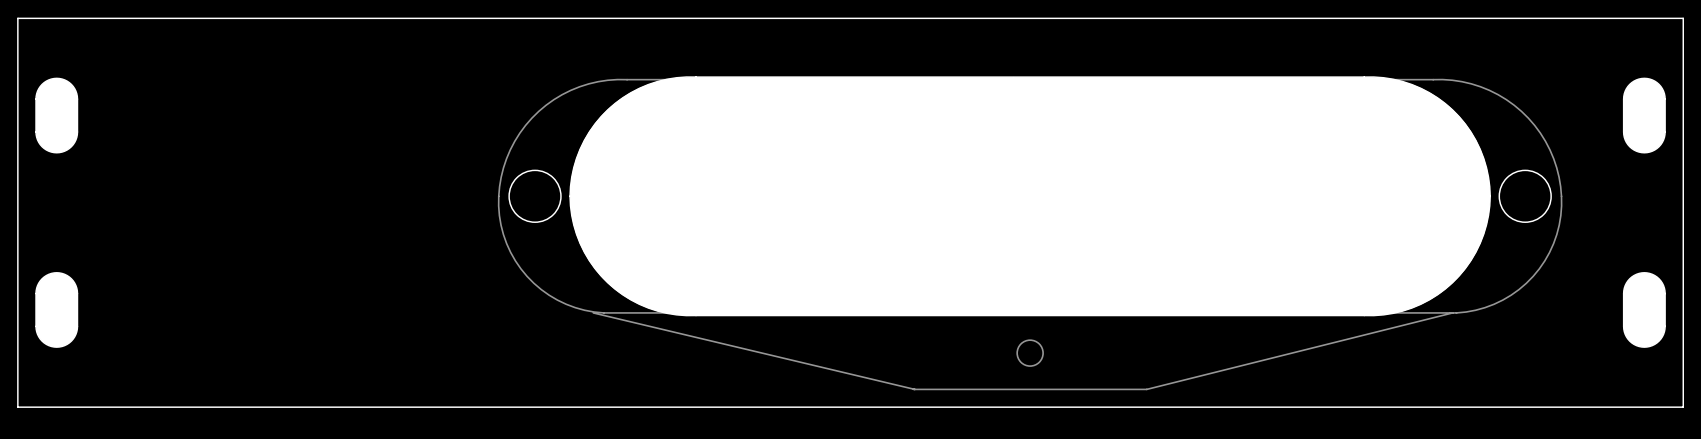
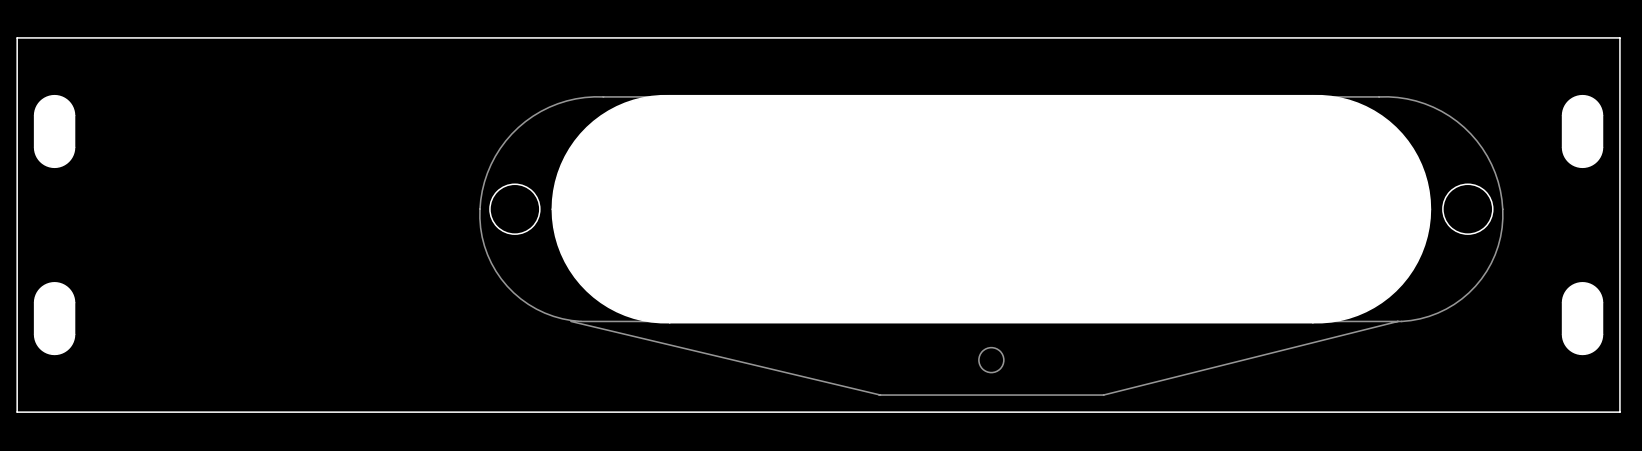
part footprint: [497, 76, 1563, 391] -> [479, 95, 1504, 396]

